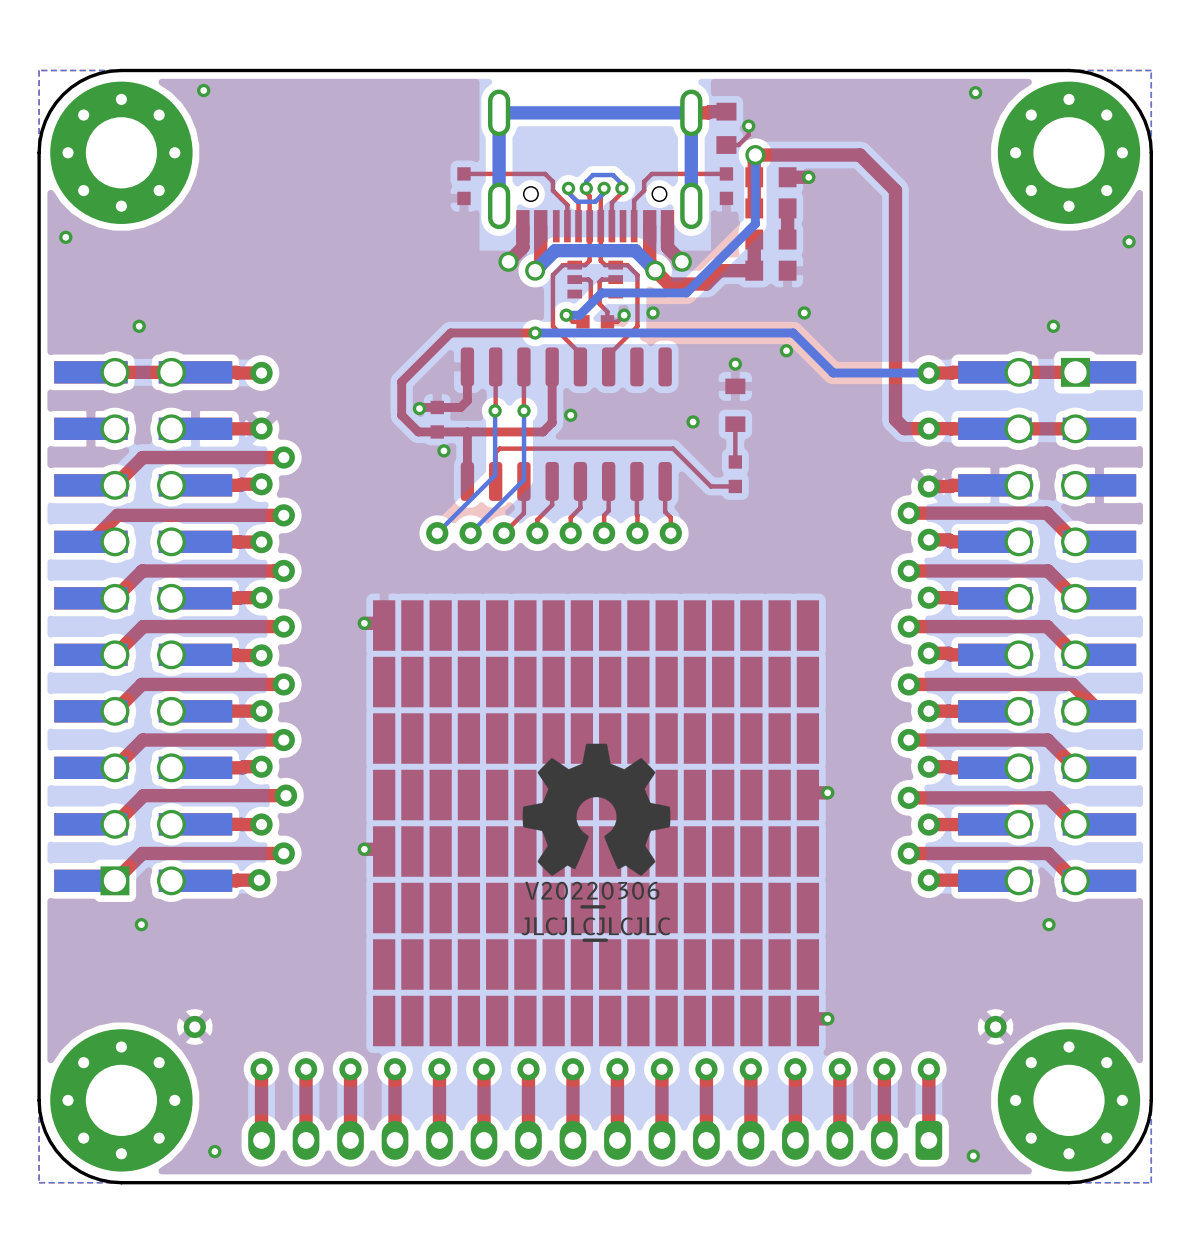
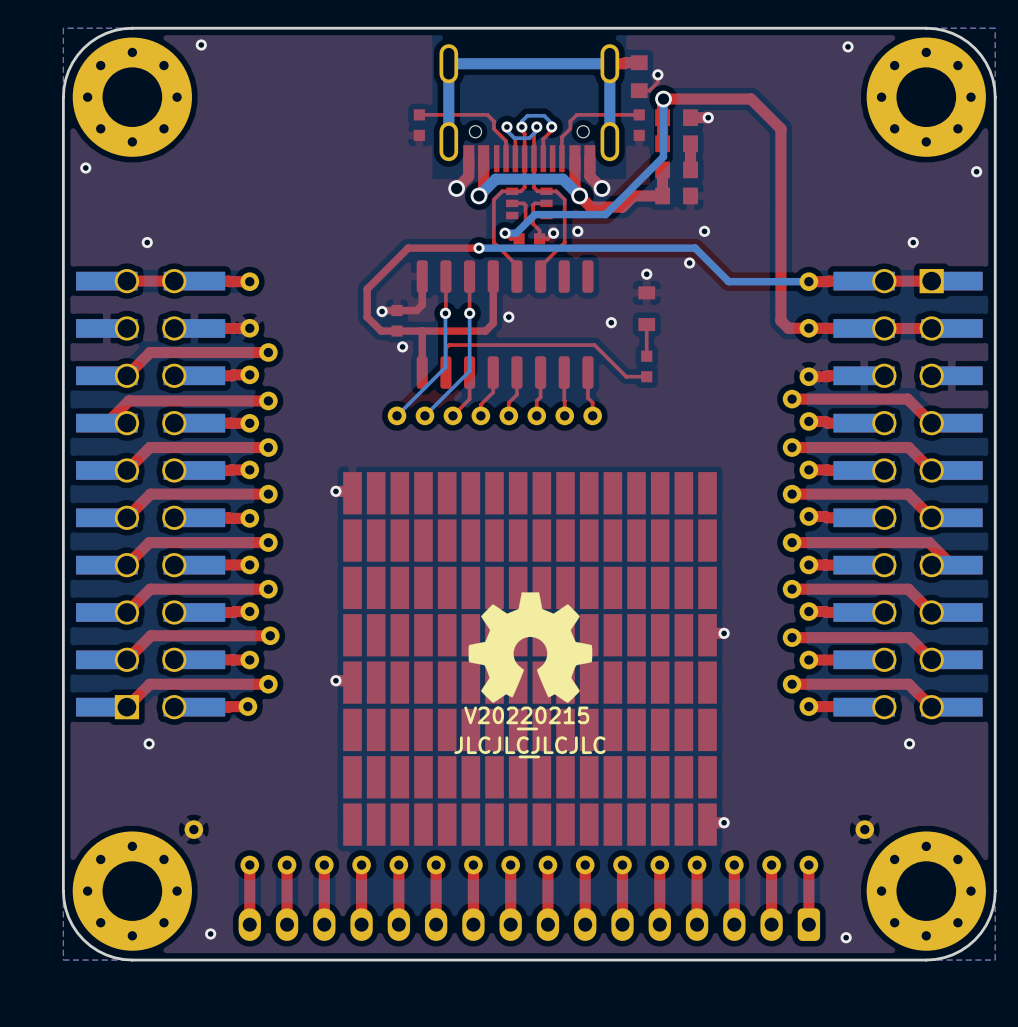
drawing shape: [525, 881, 660, 909] -> [464, 706, 590, 731]

